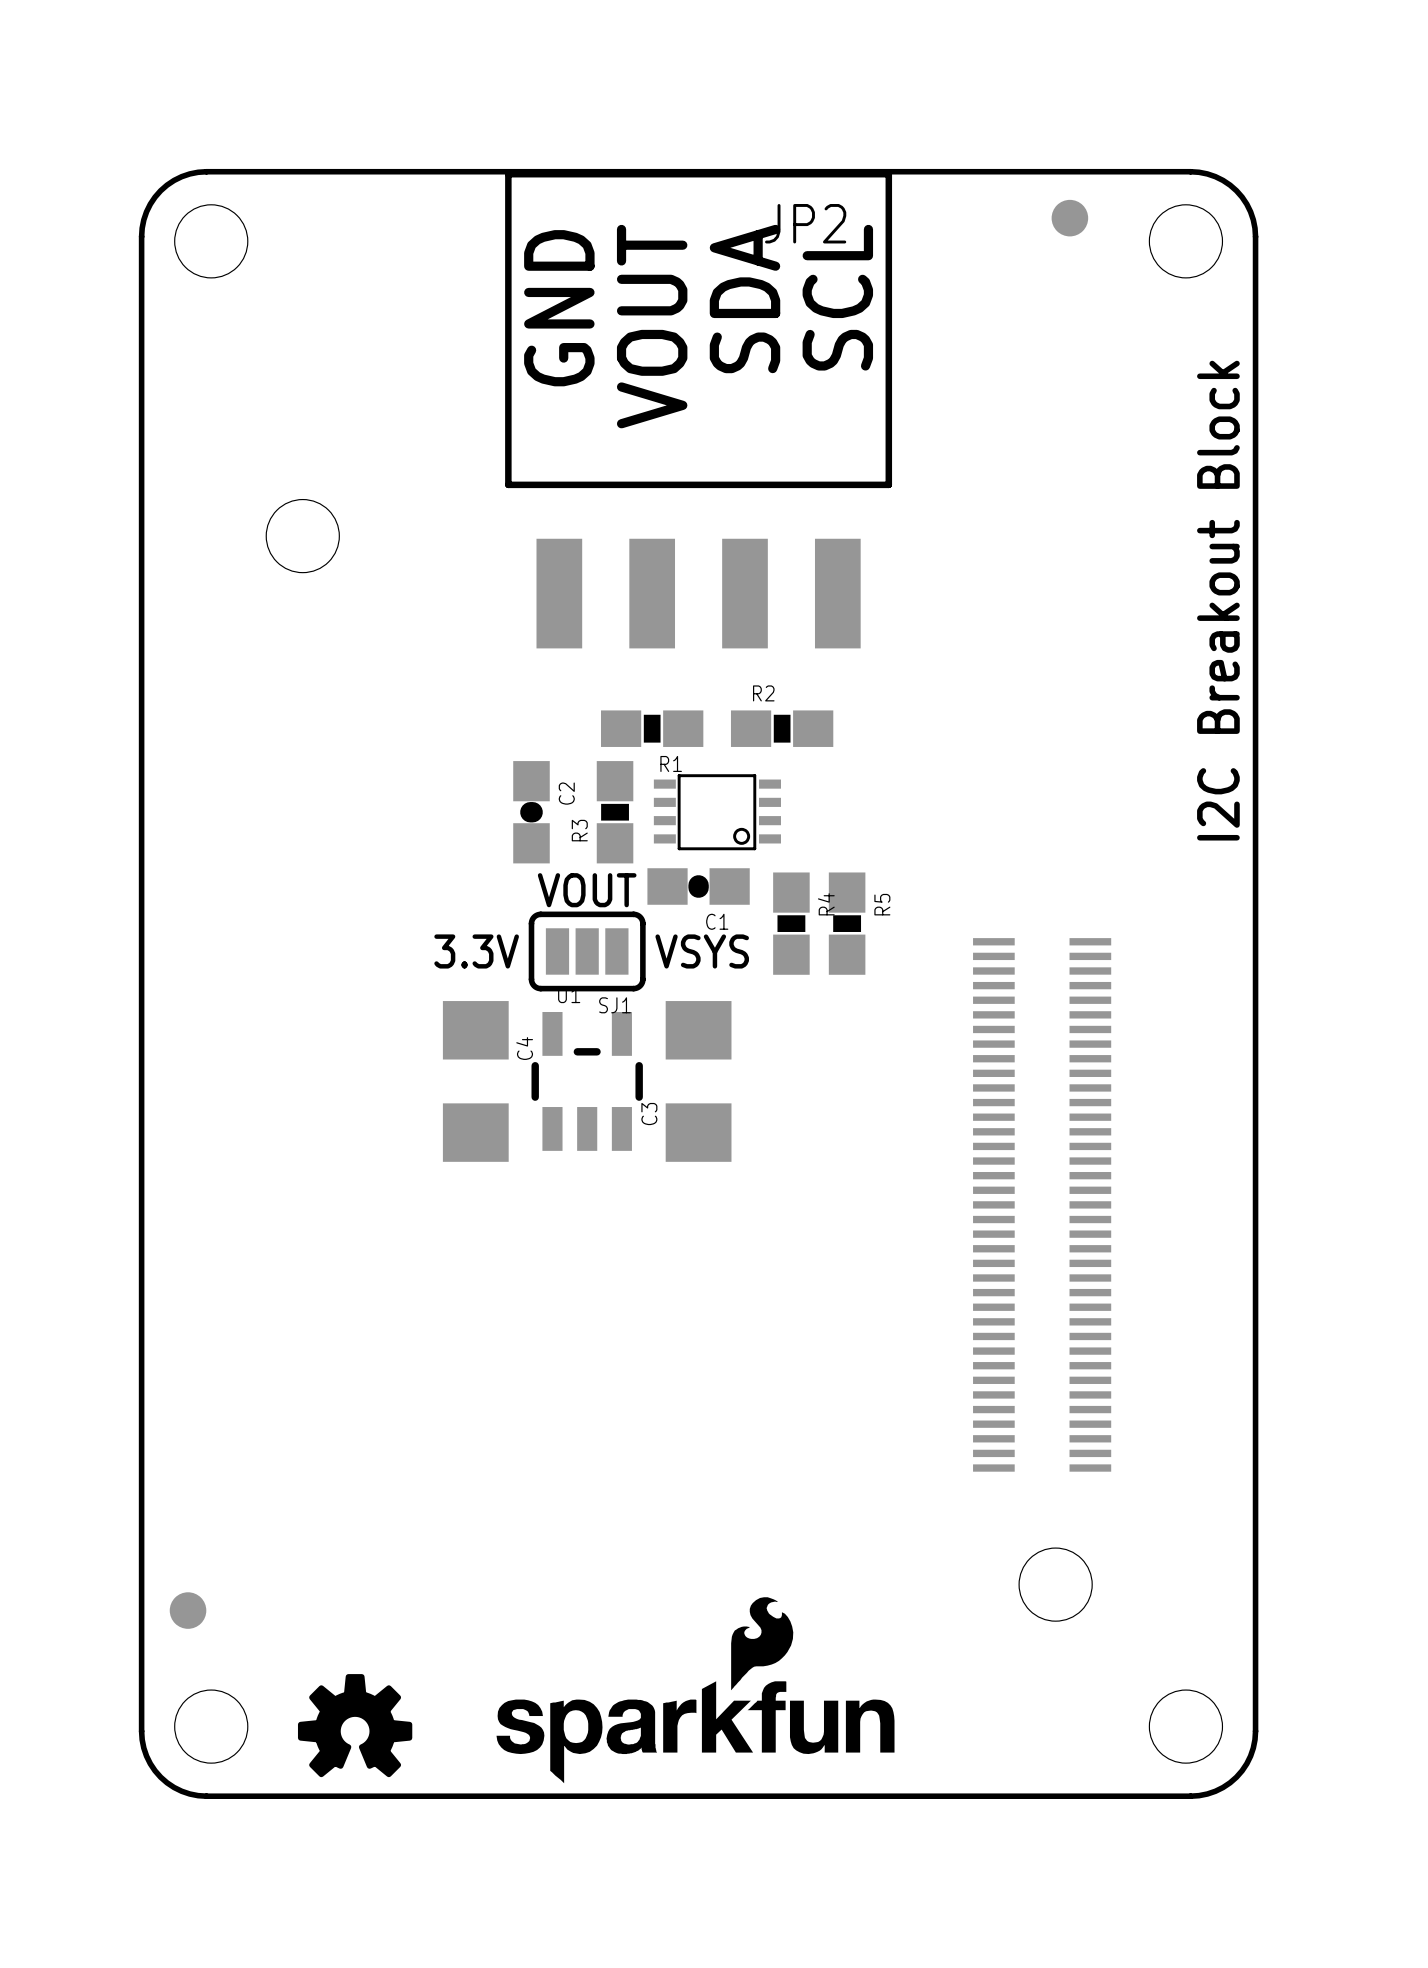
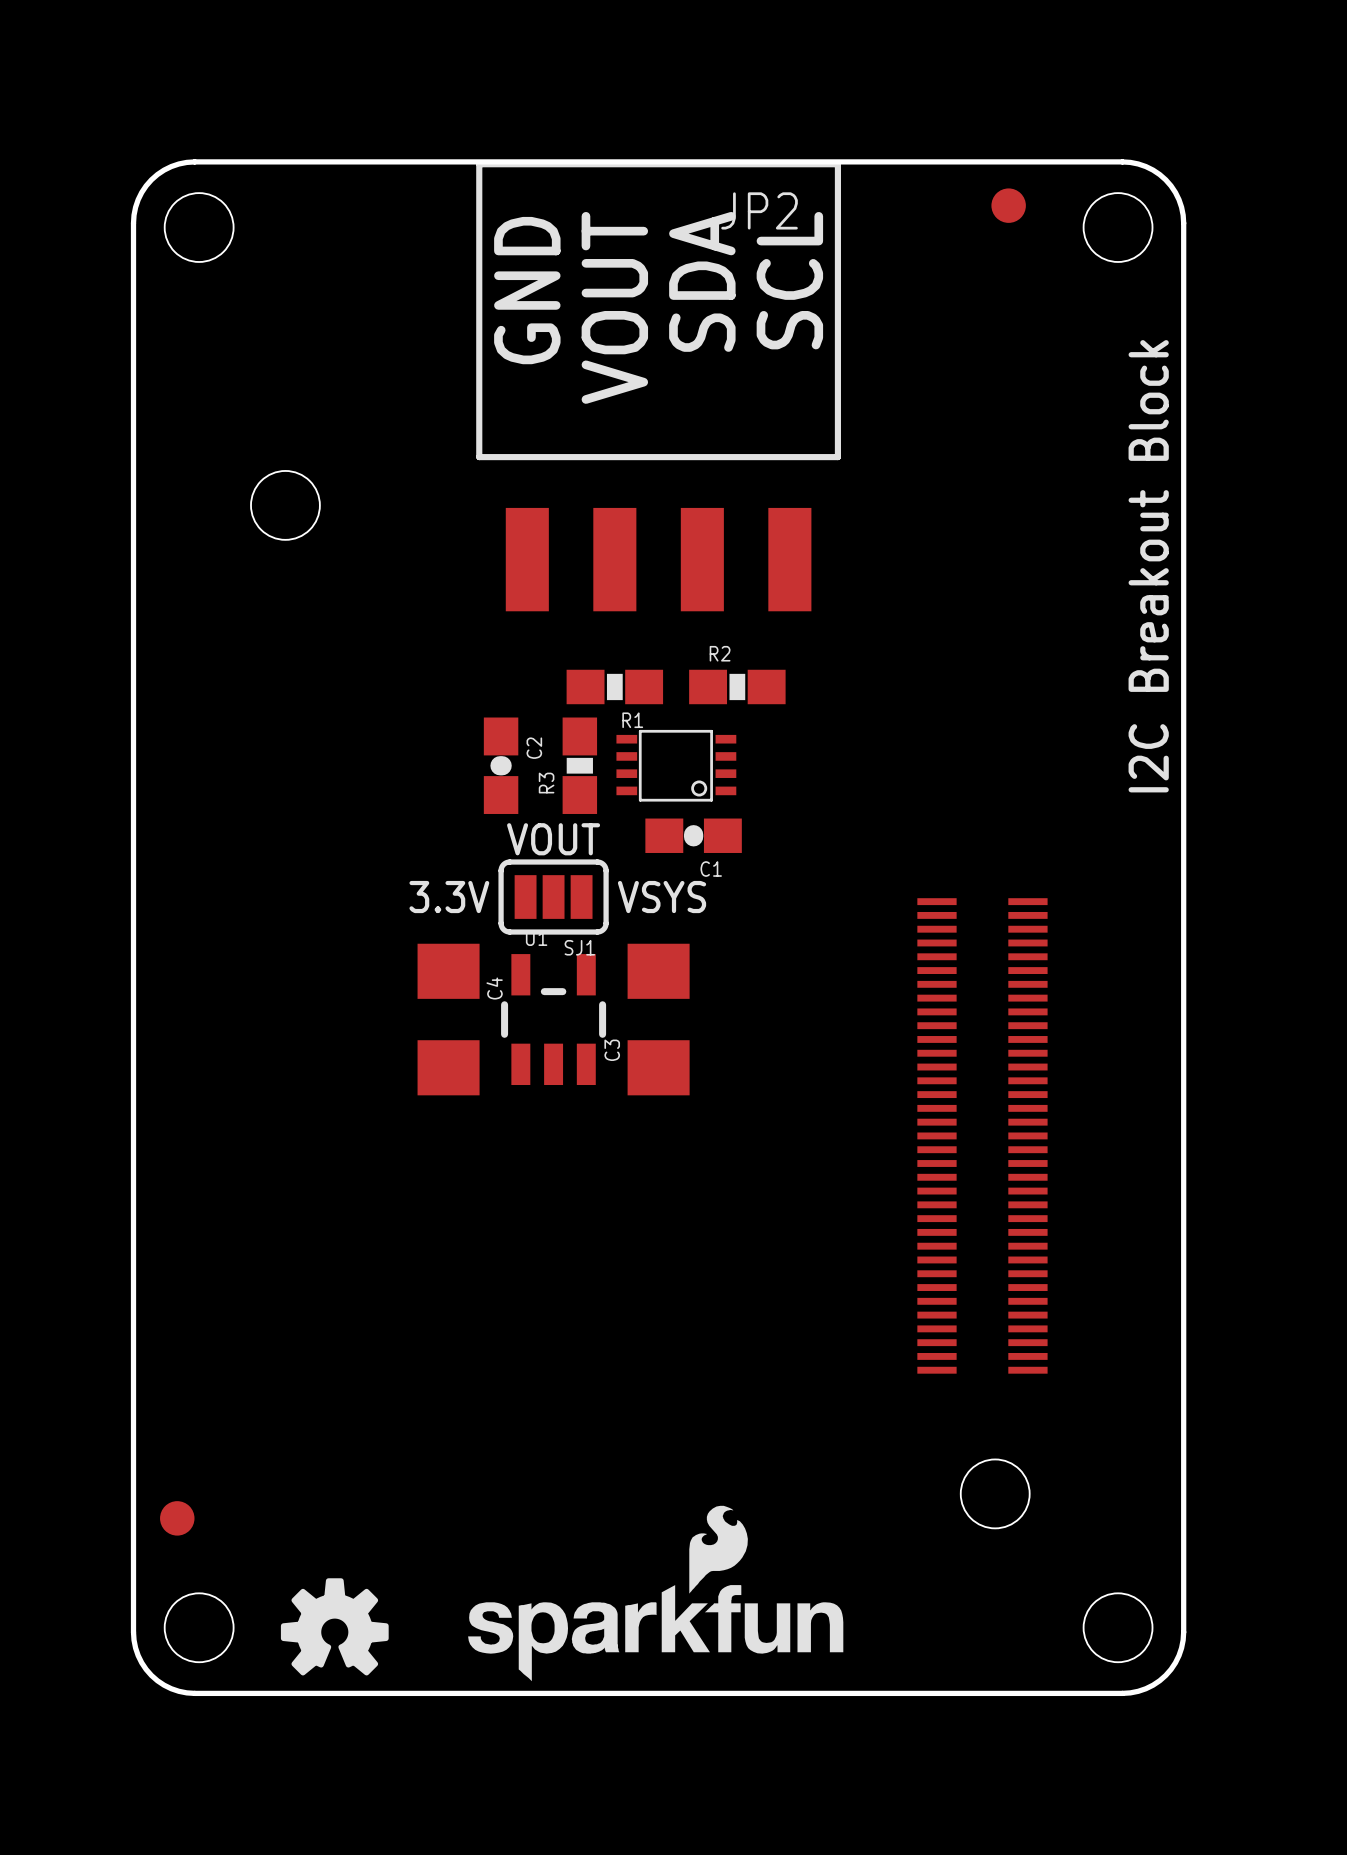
C1 position: (698, 886) -> (693, 835)
R4: (791, 923) -> none
R5: (847, 923) -> none
part footprint: [973, 938, 1112, 1472] -> [917, 898, 1048, 1374]

